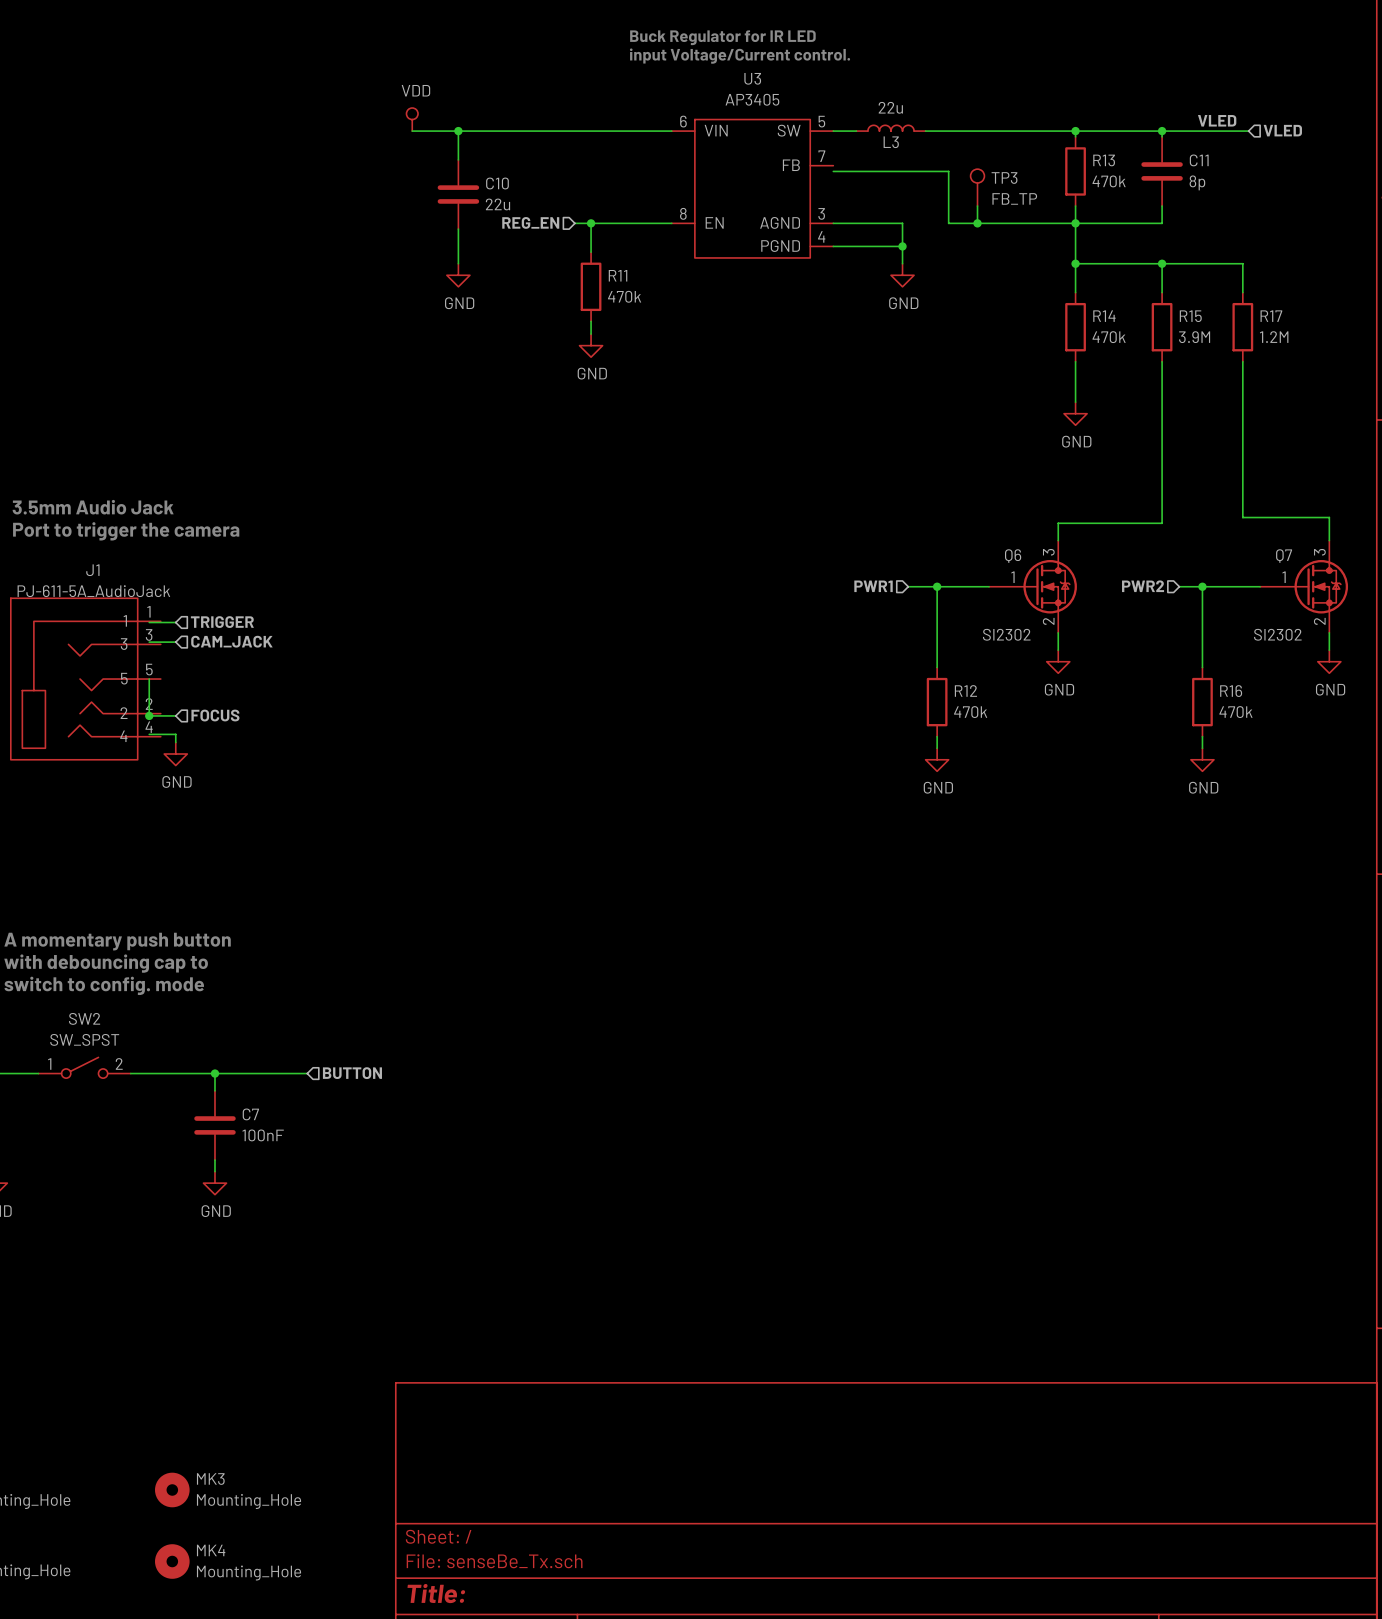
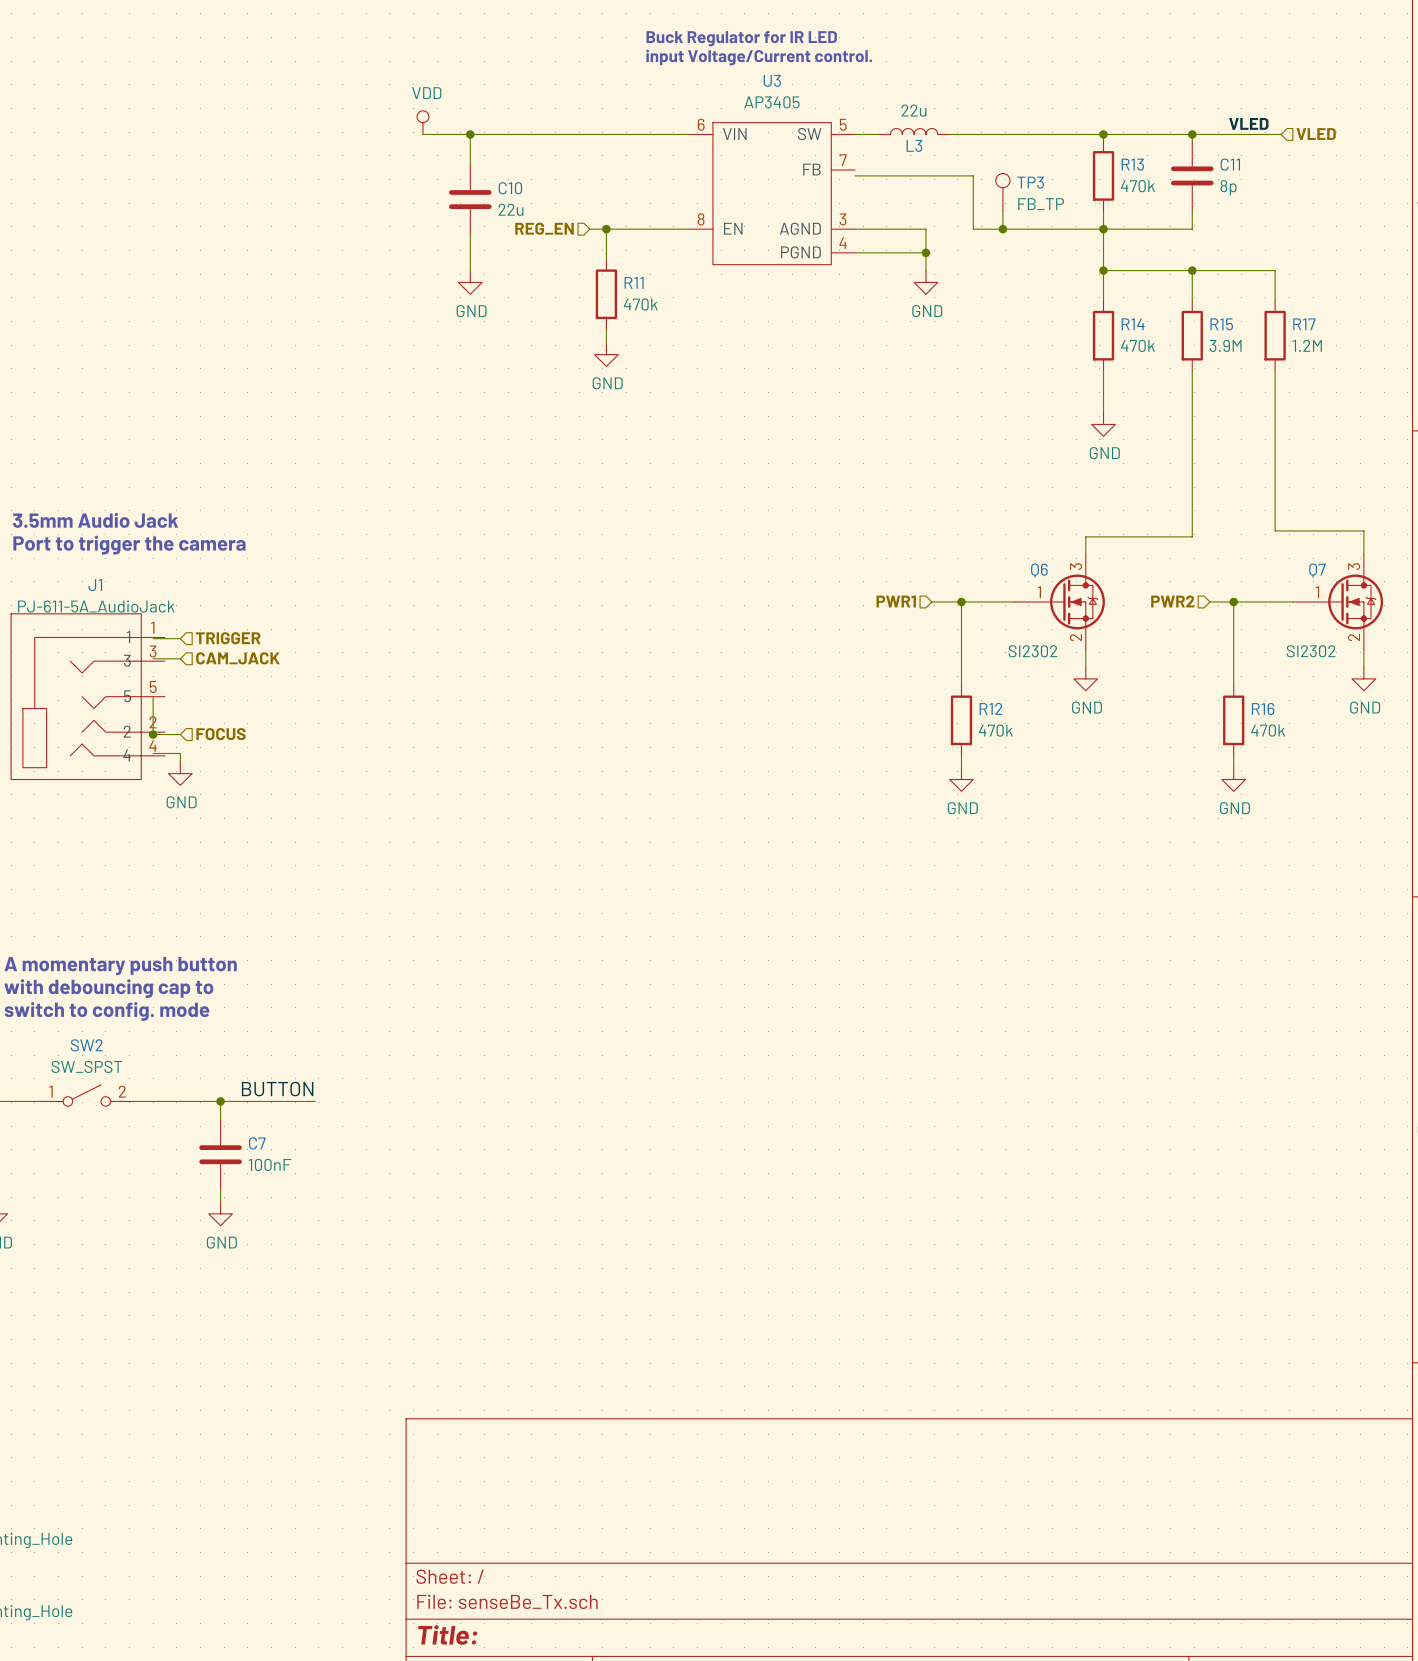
label: none -> BUTTON (277, 1089)
hierarchical label: BUTTON (352, 1073) -> none
MK3: Mounting_Hole (172, 1489) -> none
MK4: Mounting_Hole (172, 1561) -> none

